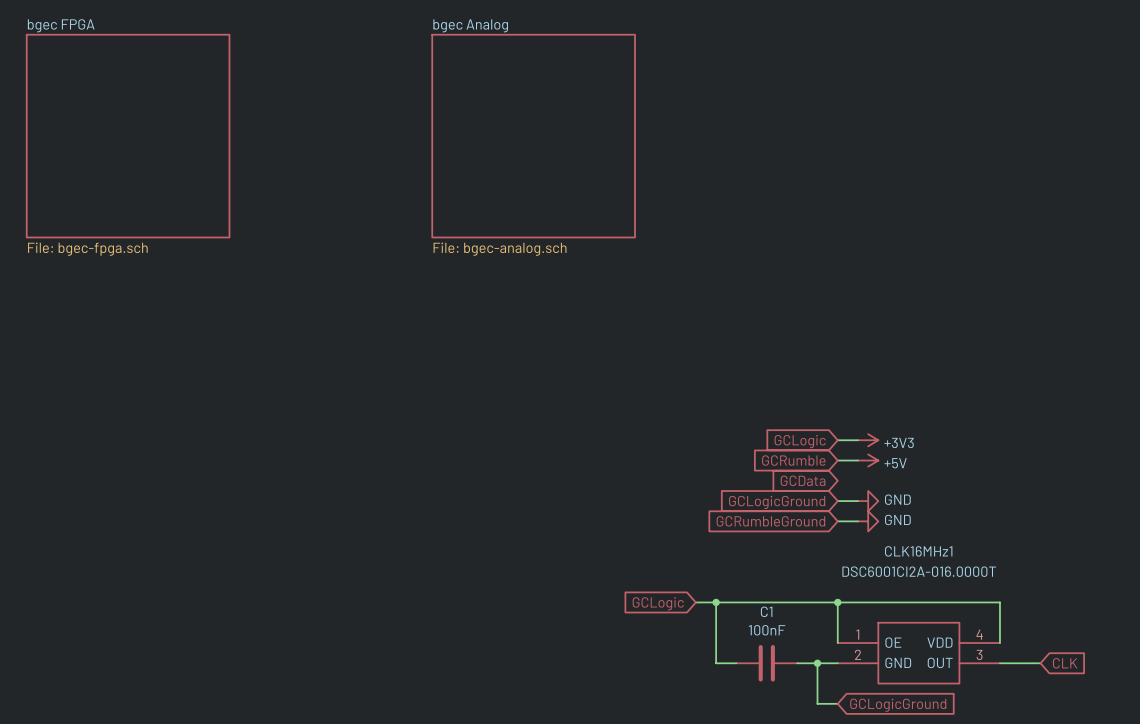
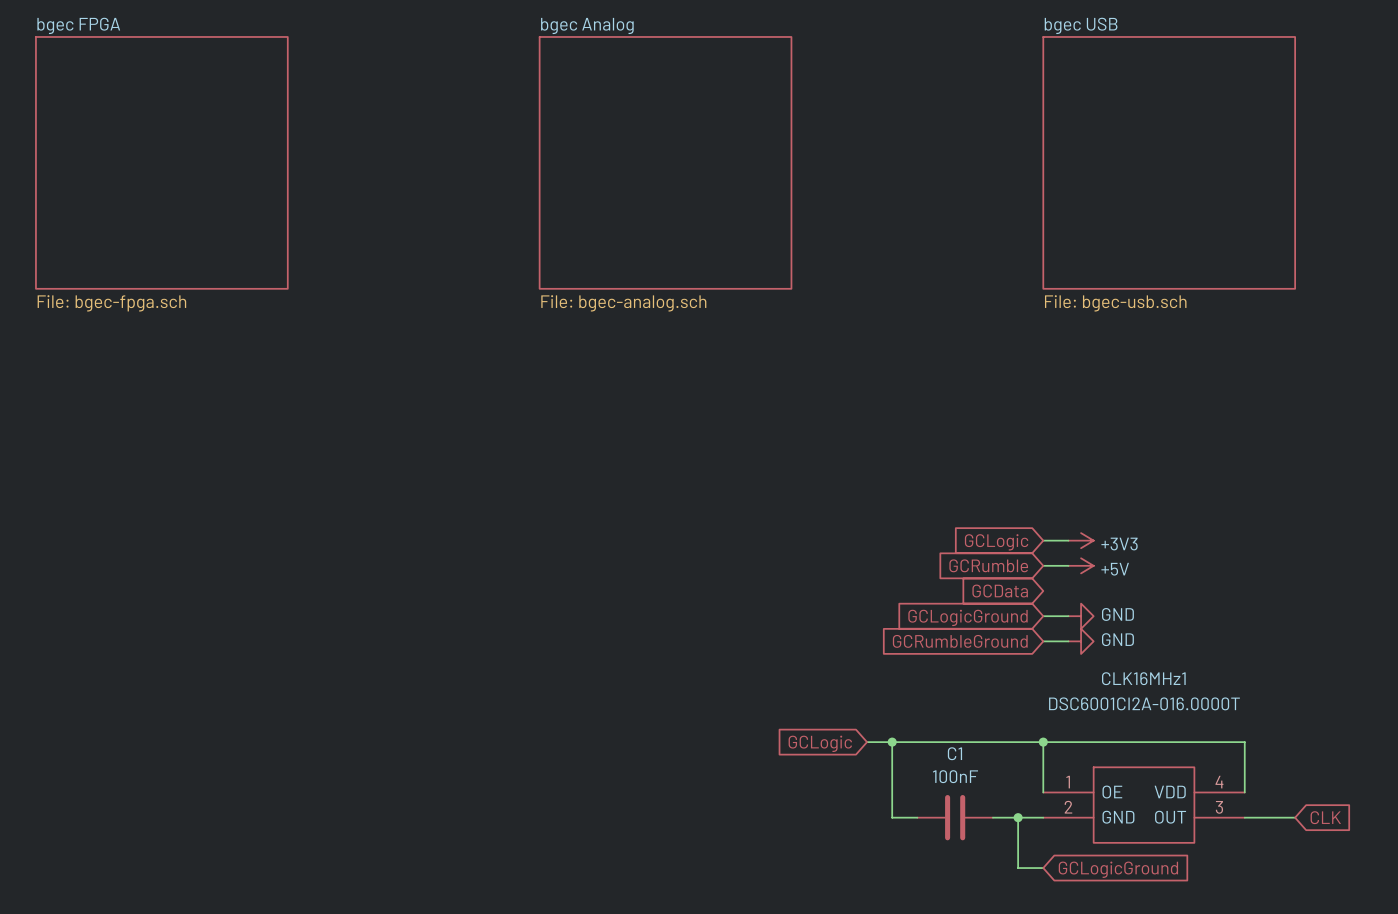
sheet bgec USB: none -> File: bgec-usb.sch (1169, 162)

